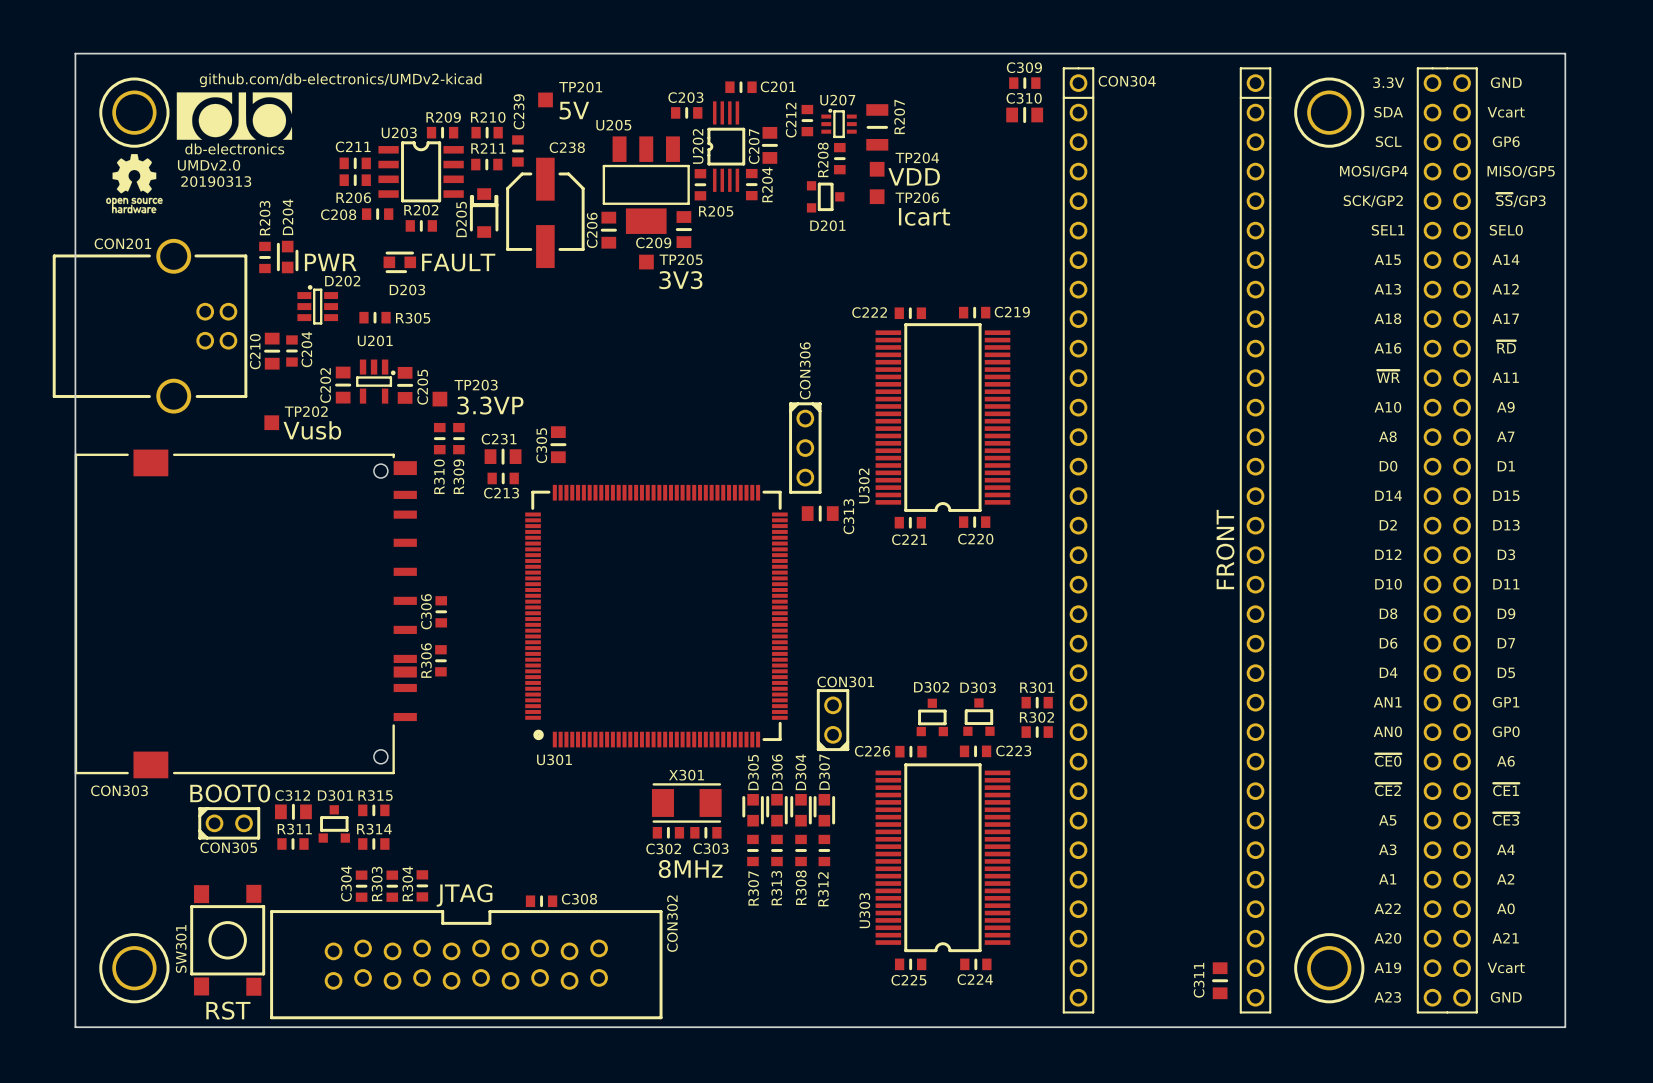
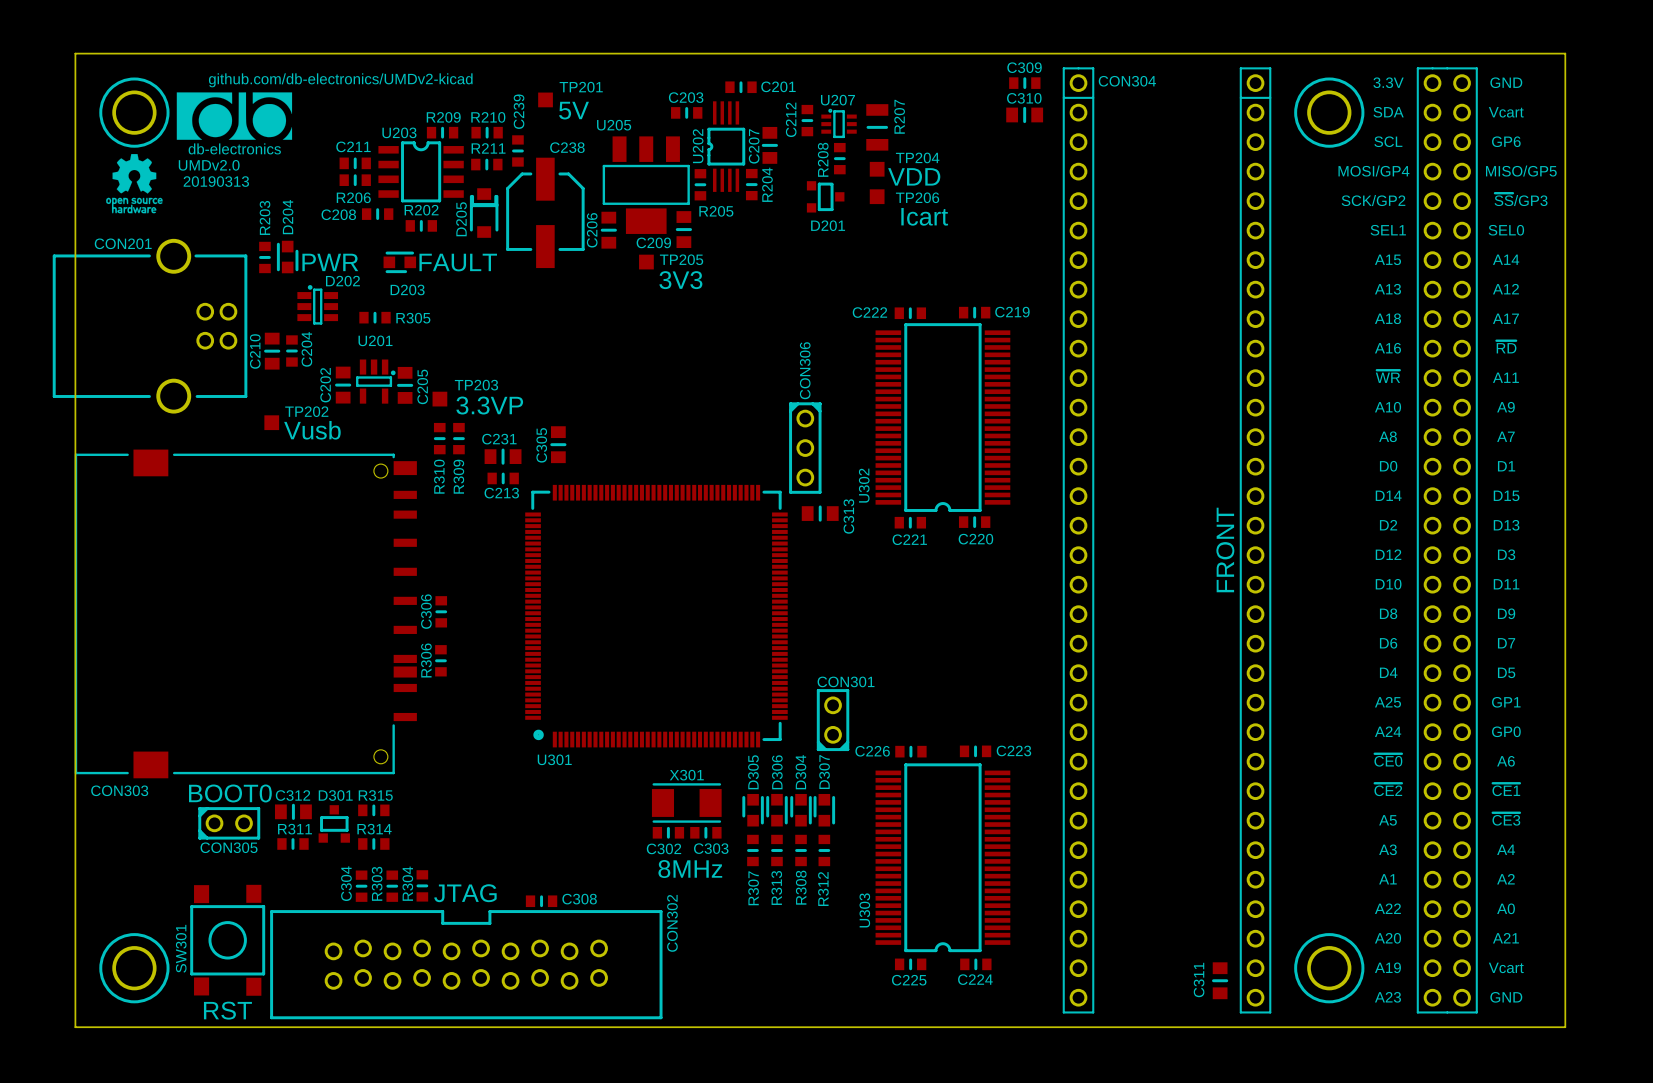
R301: (1037, 702) -> none
CON304 text: AN1 (1387, 702) -> A25 (1387, 702)
D302: (932, 717) -> none
D303: (978, 717) -> none
CON304 text: AN0 (1387, 731) -> A24 (1388, 731)
R302: (1037, 732) -> none

